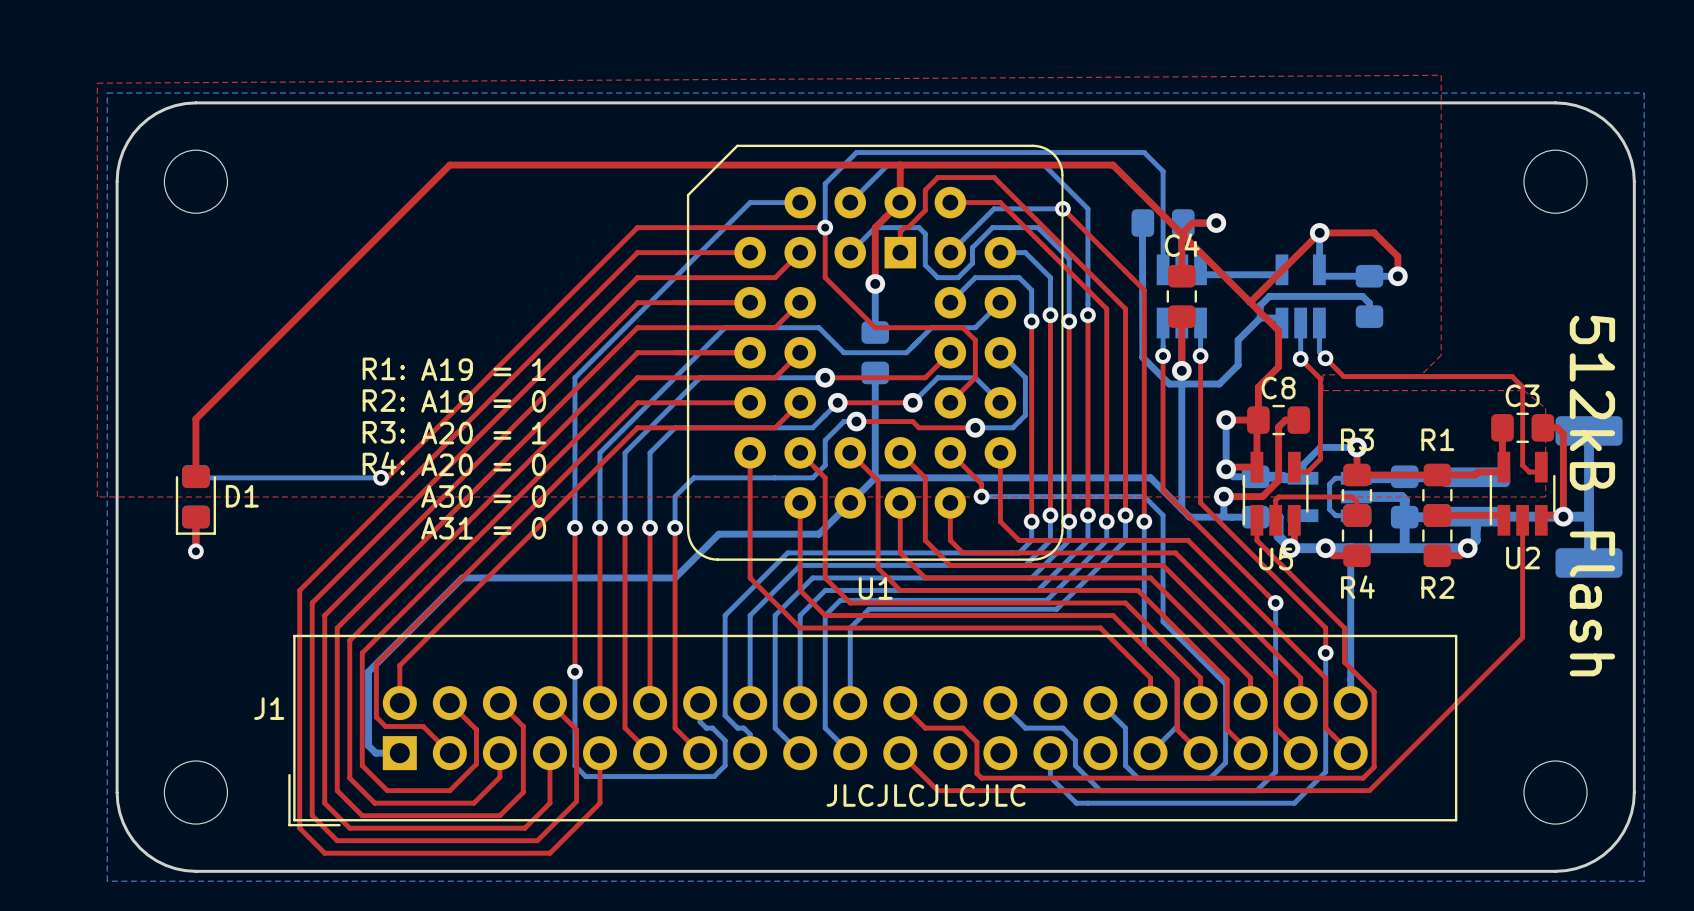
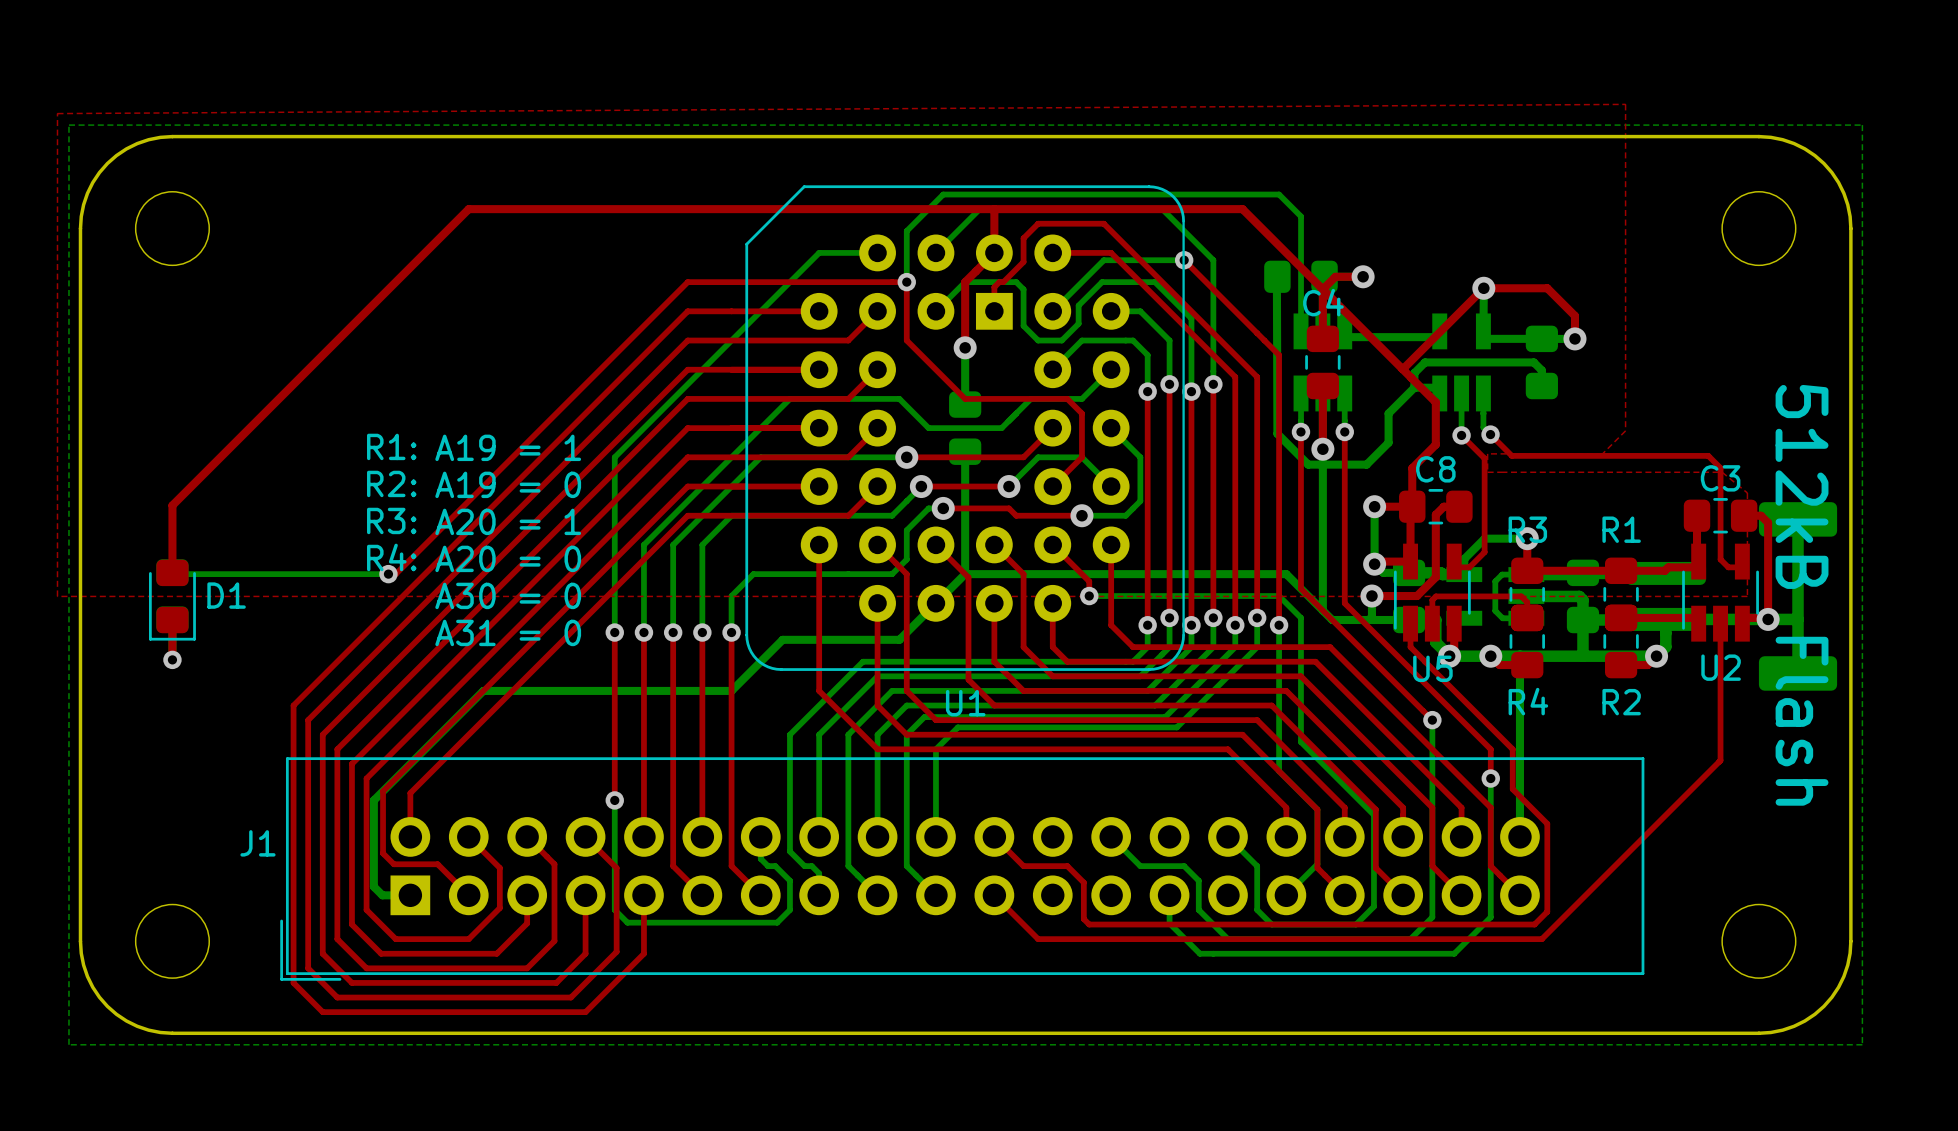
text: JLCJLCJLCJLC (926, 795) -> none

